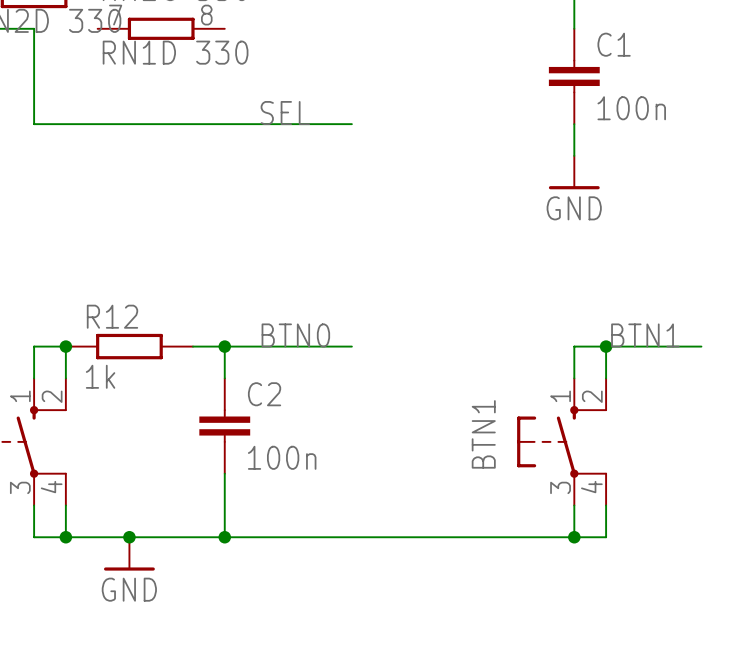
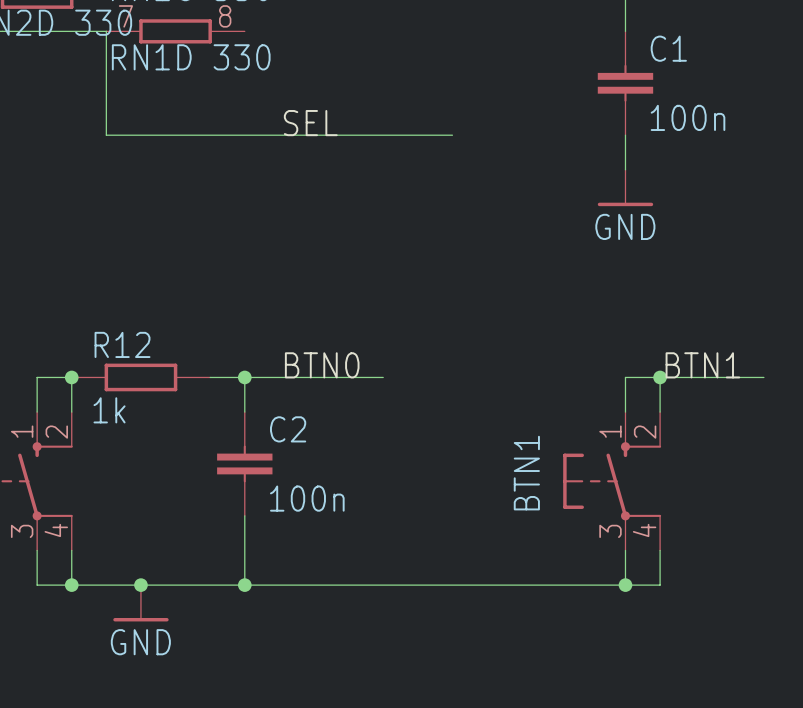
wire: (34, 28) (34, 124) (97, 124) -> (37, 31) (106, 31) (106, 135)
wire: none -> (383, 135) (452, 135)

